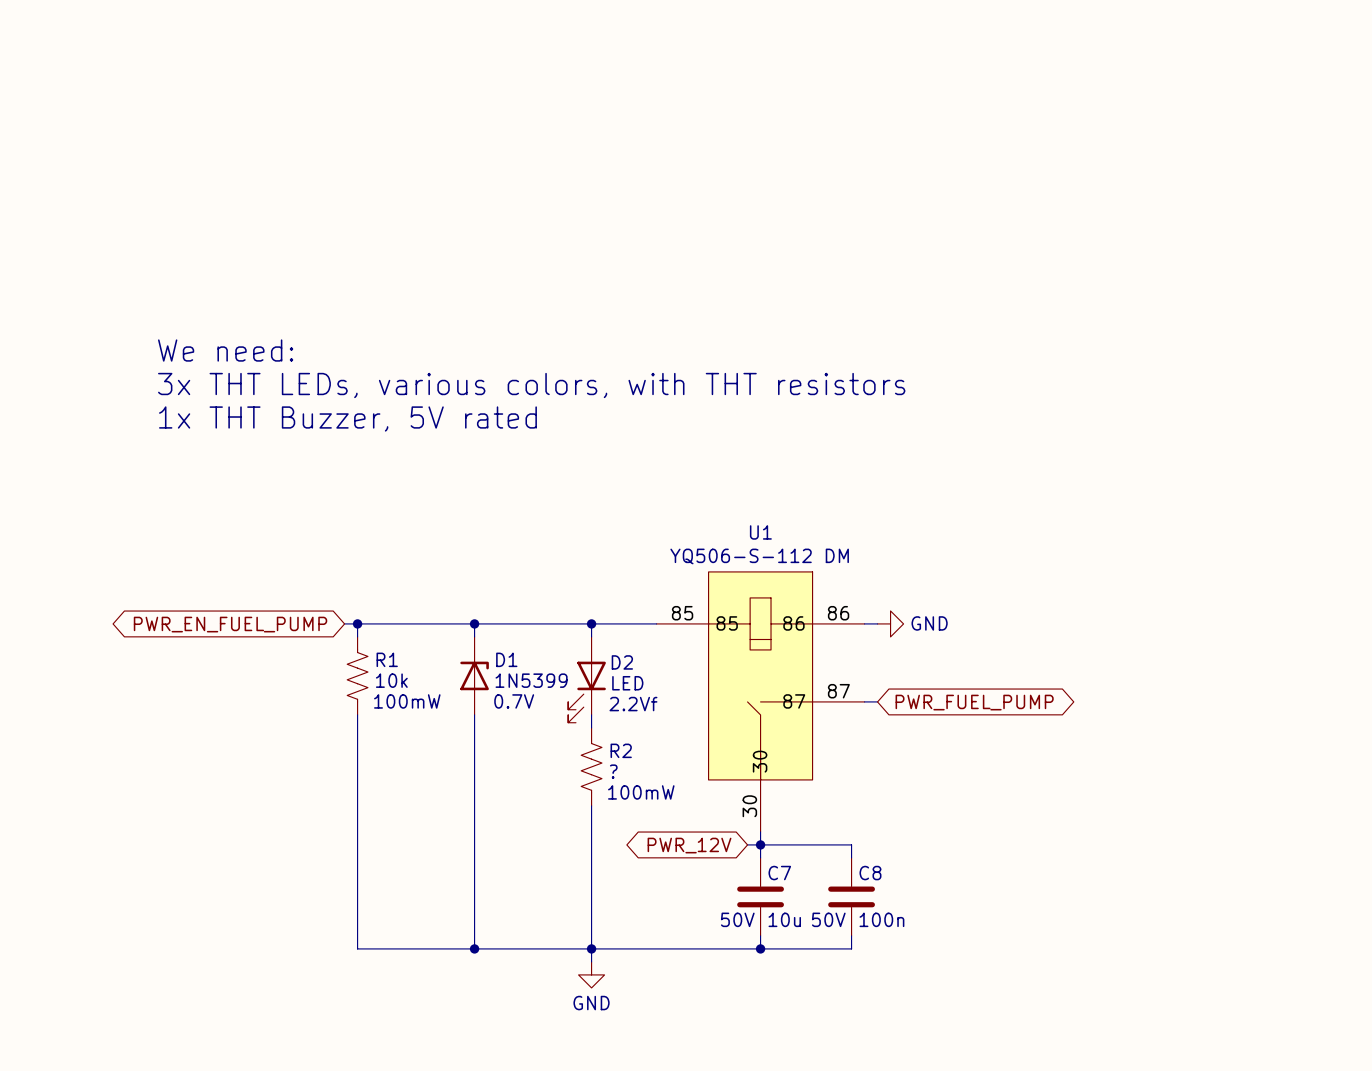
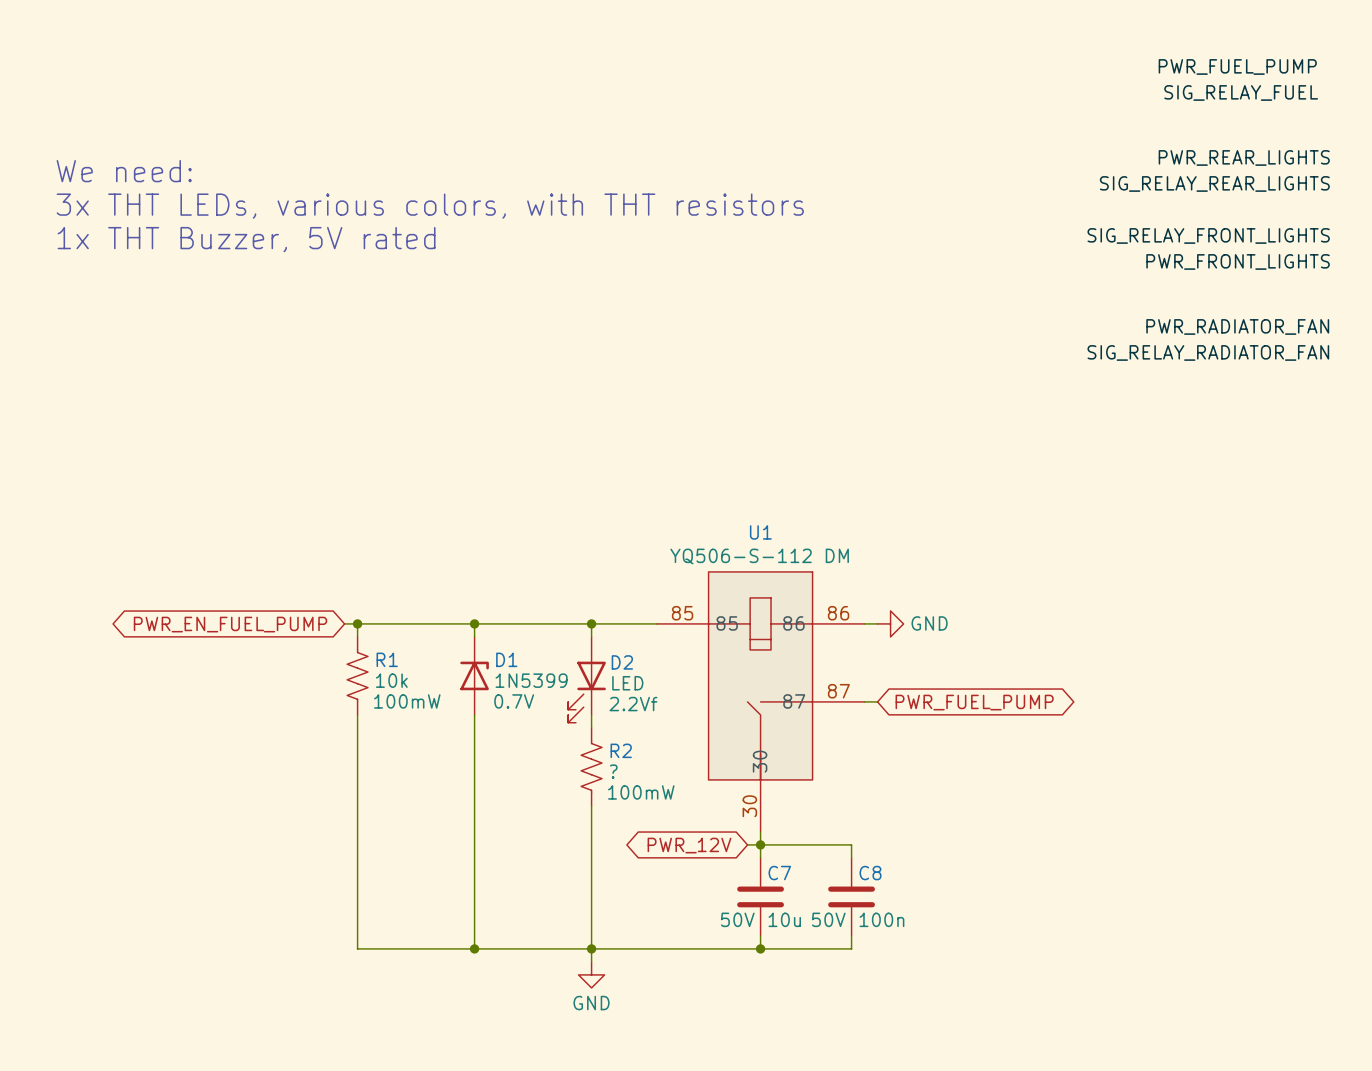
label: none -> PWR_FUEL_PUMP (1237, 66)
label: none -> SIG_RELAY_FUEL (1241, 92)
label: none -> PWR_REAR_LIGHTS (1244, 157)
label: none -> SIG_RELAY_REAR_LIGHTS (1214, 183)
label: none -> SIG_RELAY_FRONT_LIGHTS (1208, 235)
label: none -> PWR_FRONT_LIGHTS (1238, 261)
label: none -> PWR_RADIATOR_FAN (1237, 326)
text position: We need: (225, 350) -> We need: (124, 171)
label: none -> SIG_RELAY_RADIATOR_FAN (1208, 352)
text position: 3x THT LEDs, various colors, with THT resistors (531, 385) -> 3x THT LEDs, various colors, with THT resistors (430, 206)
text position: 1x THT Buzzer, 5V rated (347, 418) -> 1x THT Buzzer, 5V rated (246, 239)

